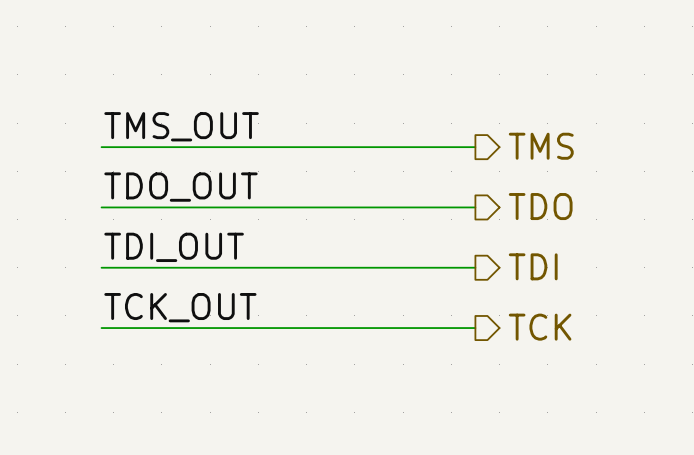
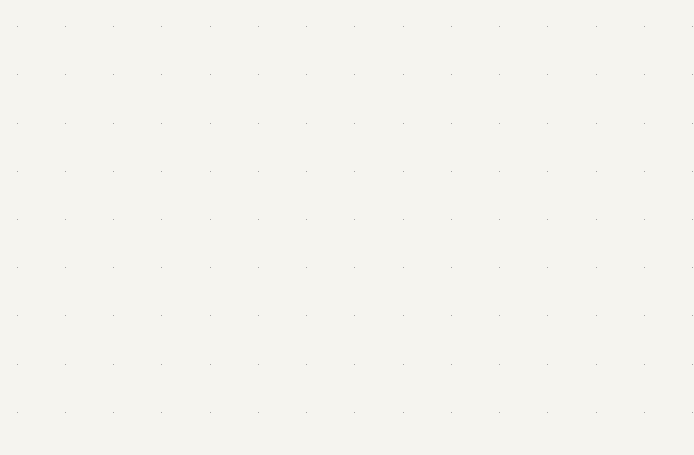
label: TMS_OUT (181, 126) -> none
hierarchical label: TMS (541, 146) -> none
wire: (101, 147) (475, 147) -> none
label: TDO_OUT (180, 187) -> none
hierarchical label: TDO (540, 206) -> none
wire: (101, 207) (475, 207) -> none
label: TDI_OUT (174, 247) -> none
hierarchical label: TDI (533, 266) -> none
wire: (101, 267) (475, 267) -> none
label: TCK_OUT (180, 307) -> none
hierarchical label: TCK (540, 327) -> none
wire: (101, 328) (475, 328) -> none

